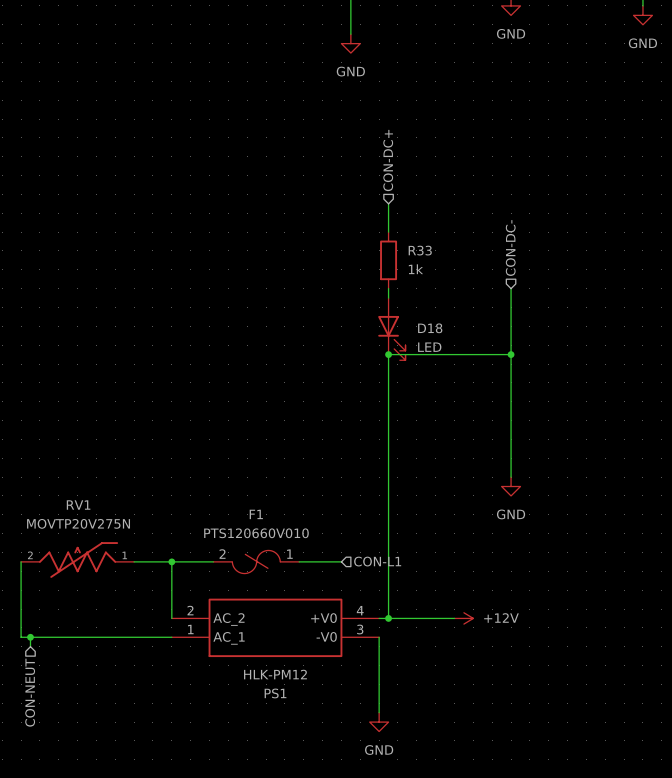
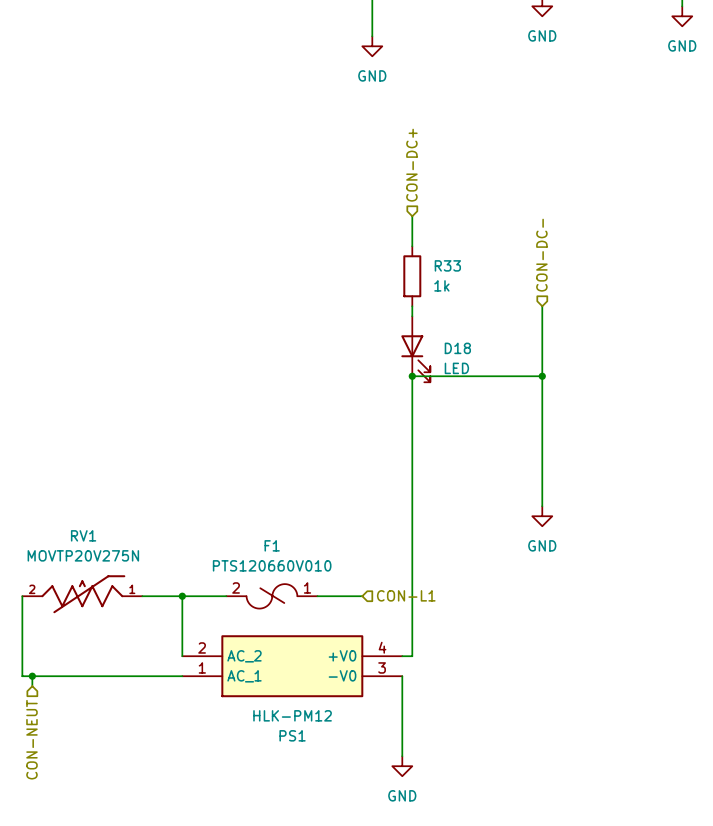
wire: (388, 618) (454, 618) -> none
junction: (388, 618) -> none
power symbol: +12V (463, 618) -> none

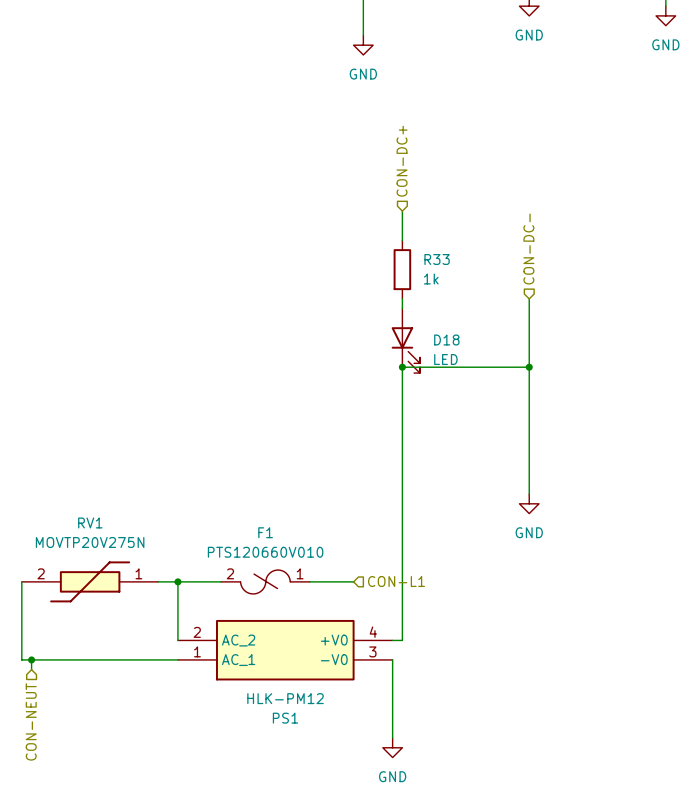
RV1 symbol: [22, 575, 143, 614] -> [21, 561, 159, 603]

